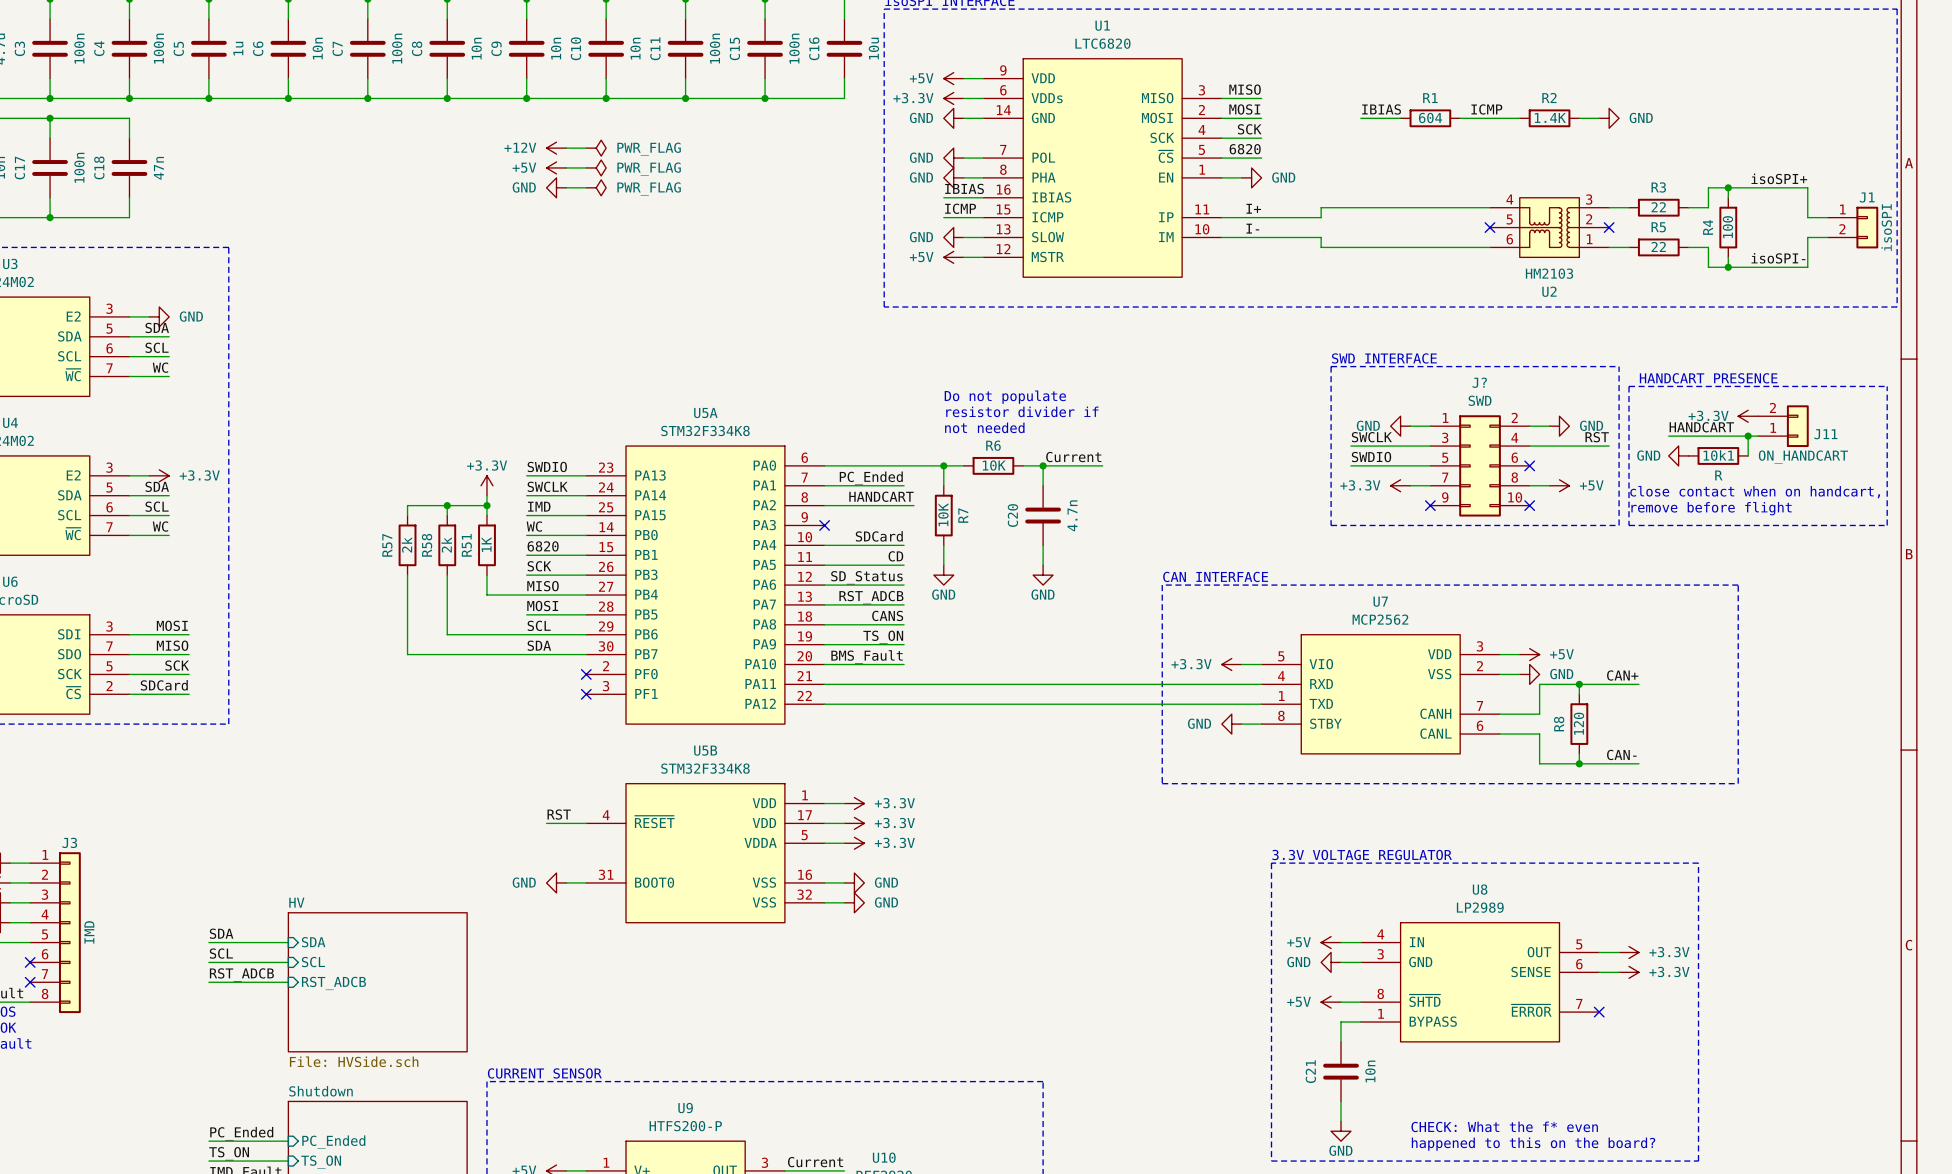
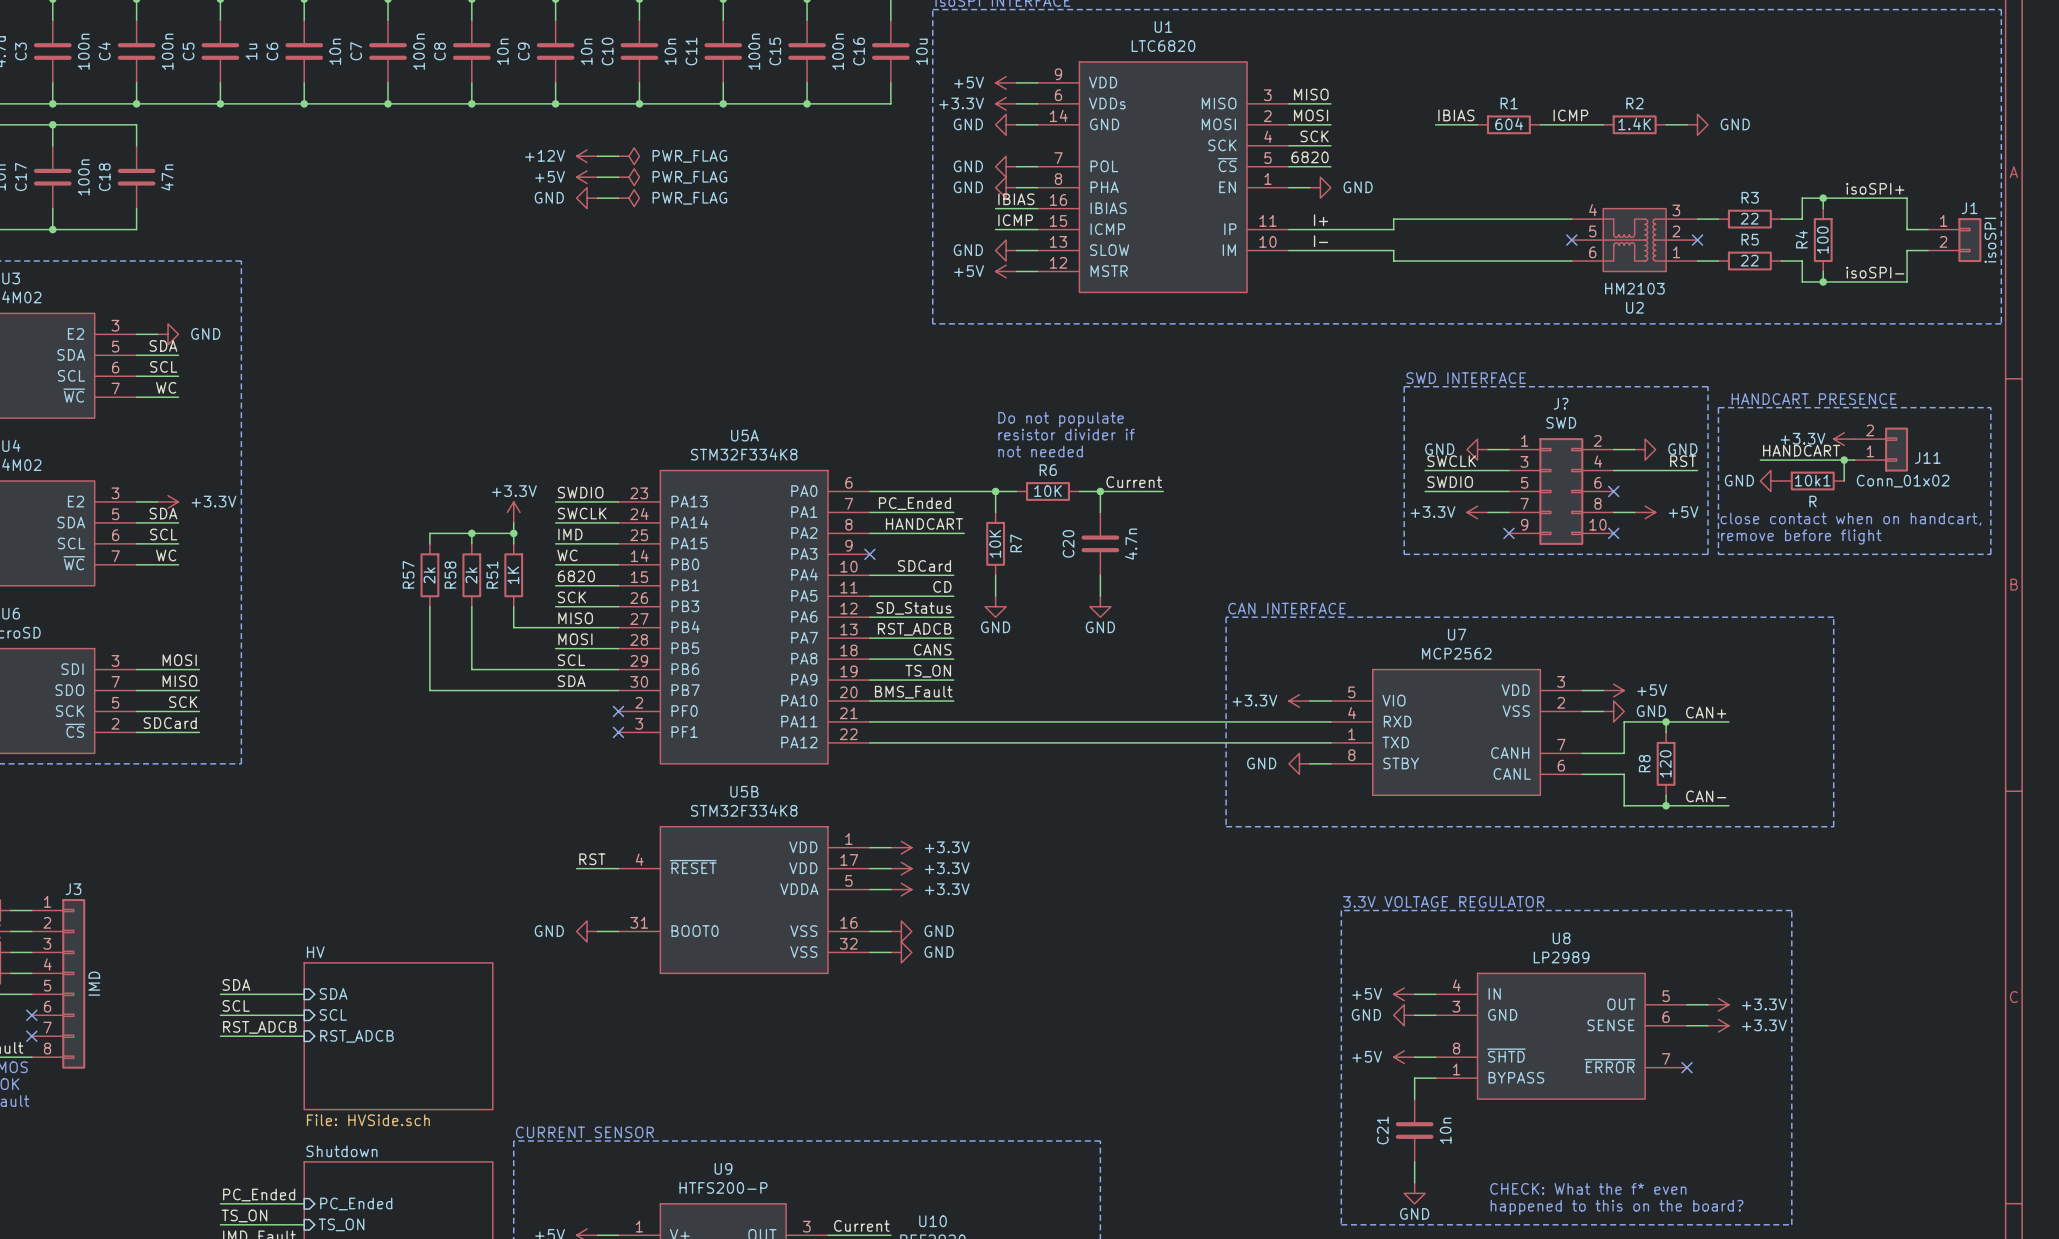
J11 value: ON_HANDCART (1803, 457) -> Conn_01x02 (1903, 481)

